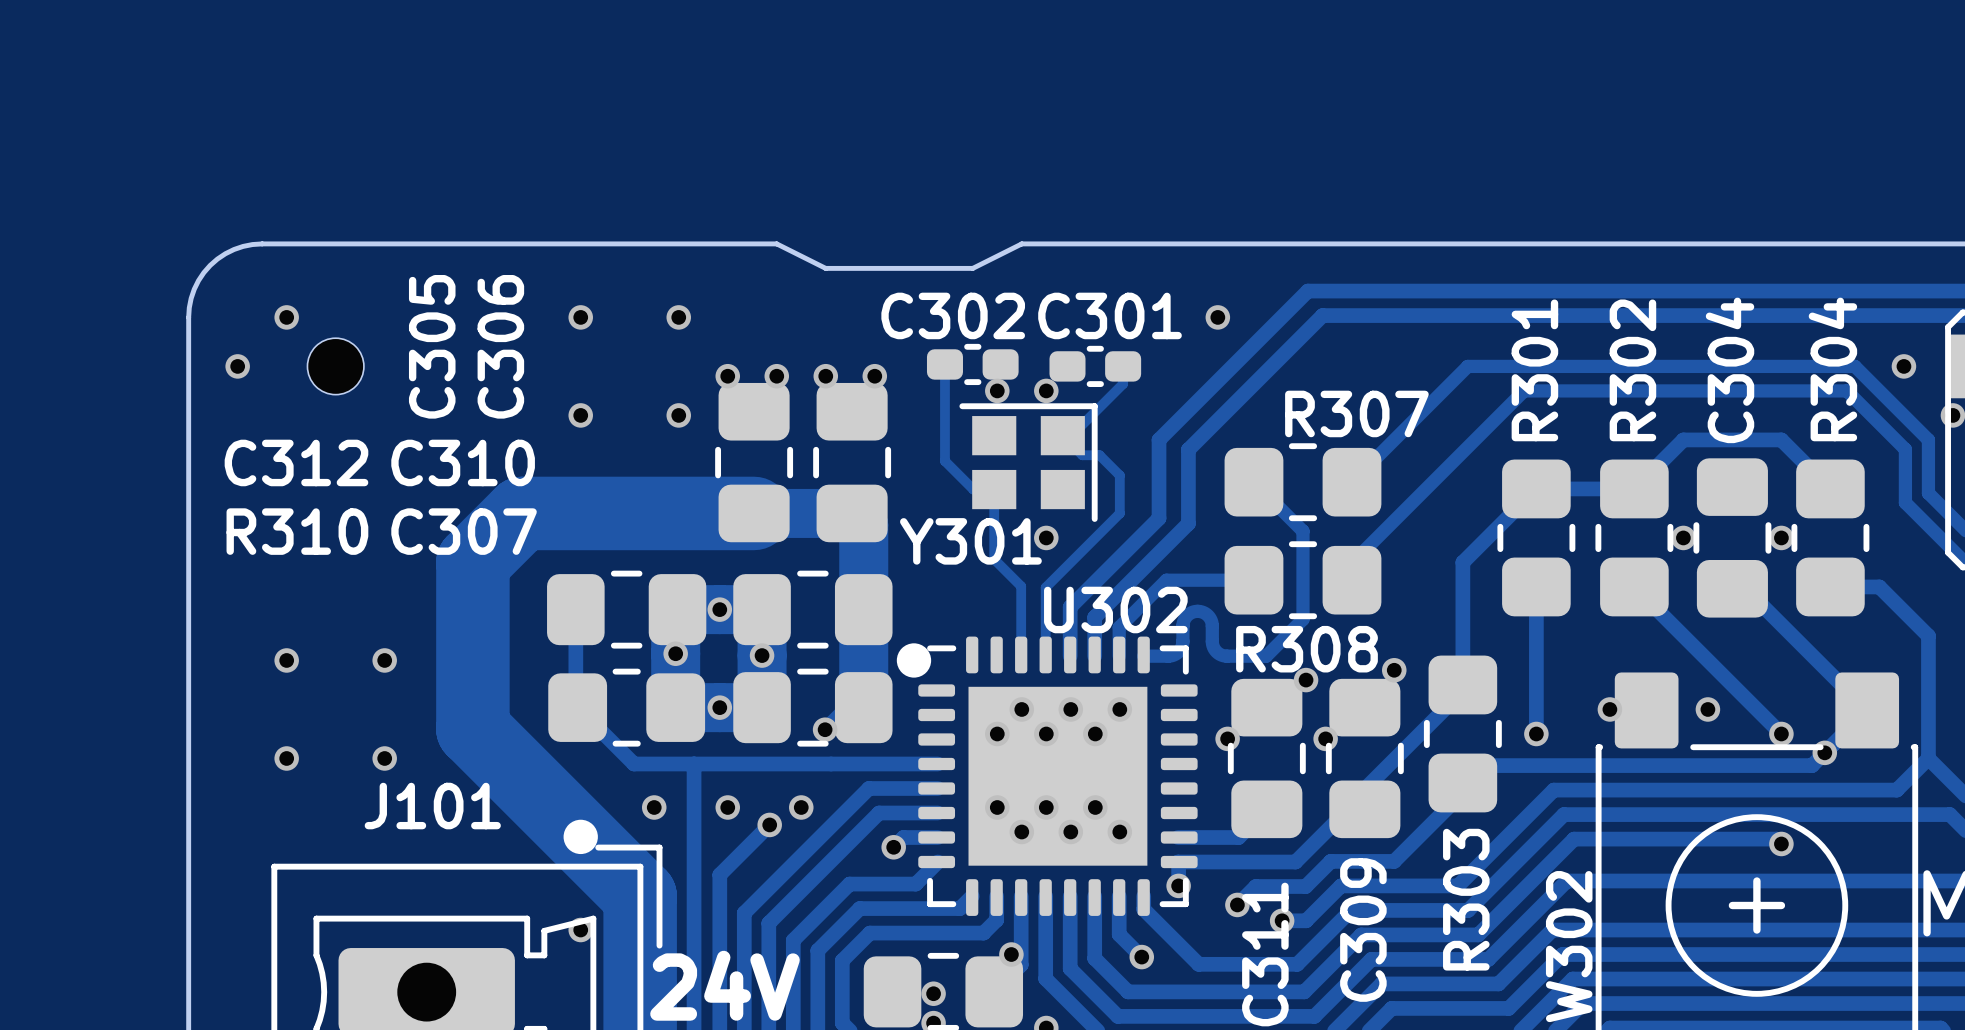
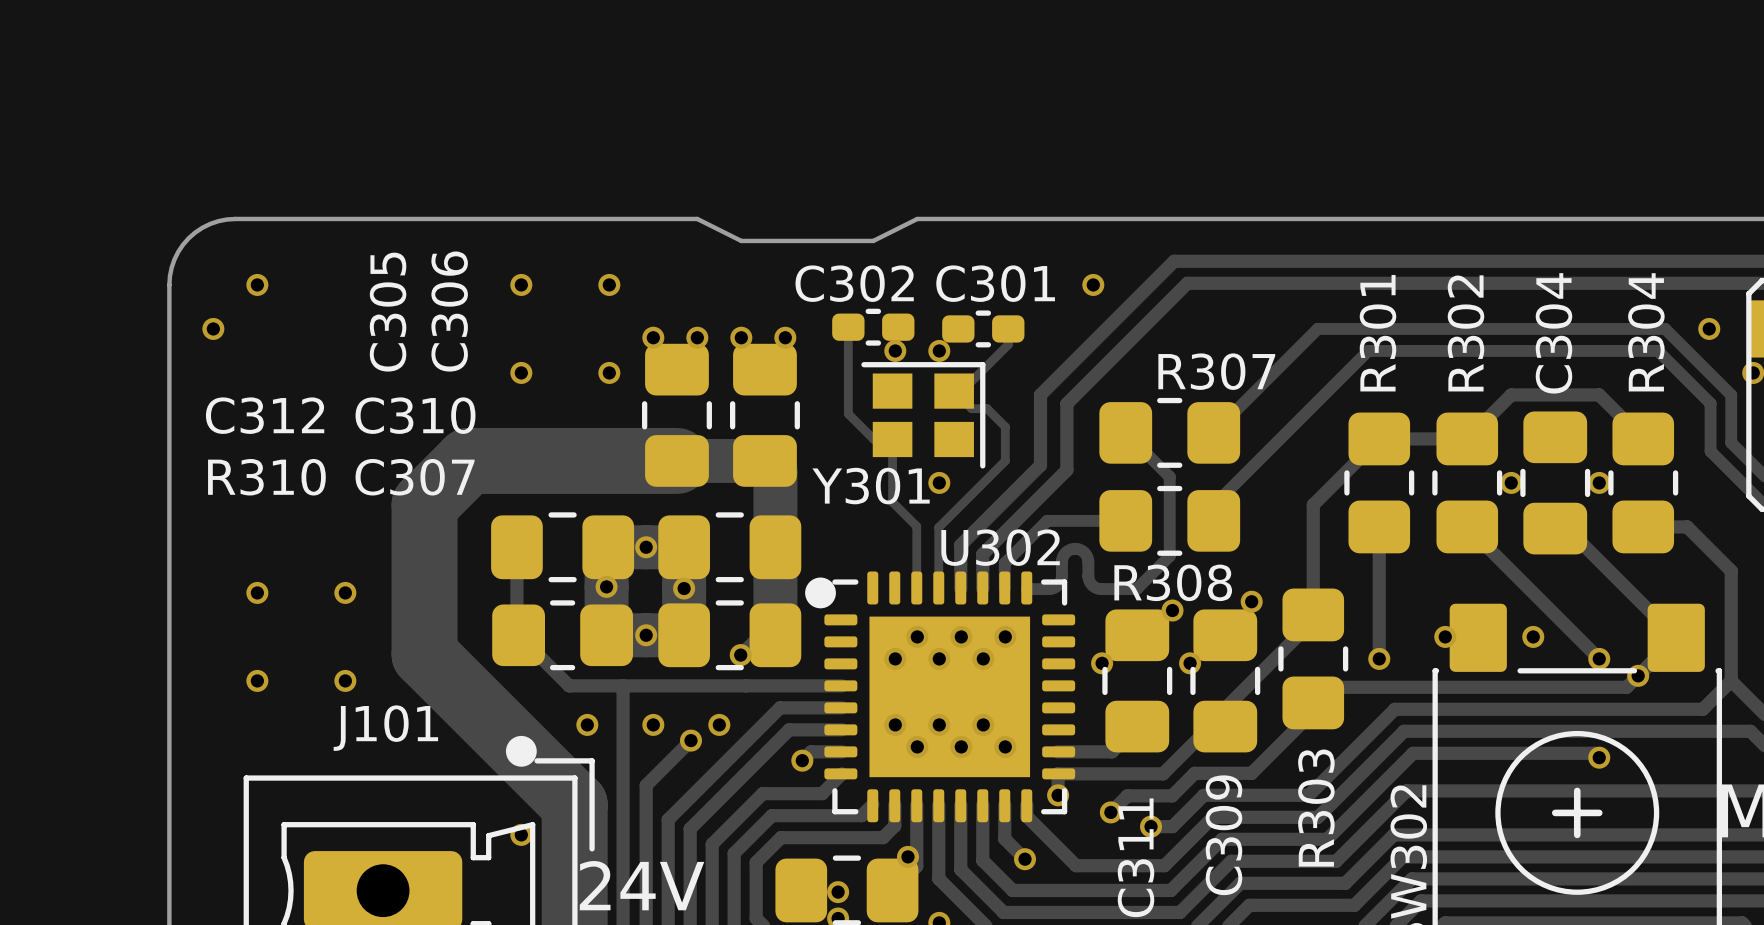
part: (335, 366) -> none

